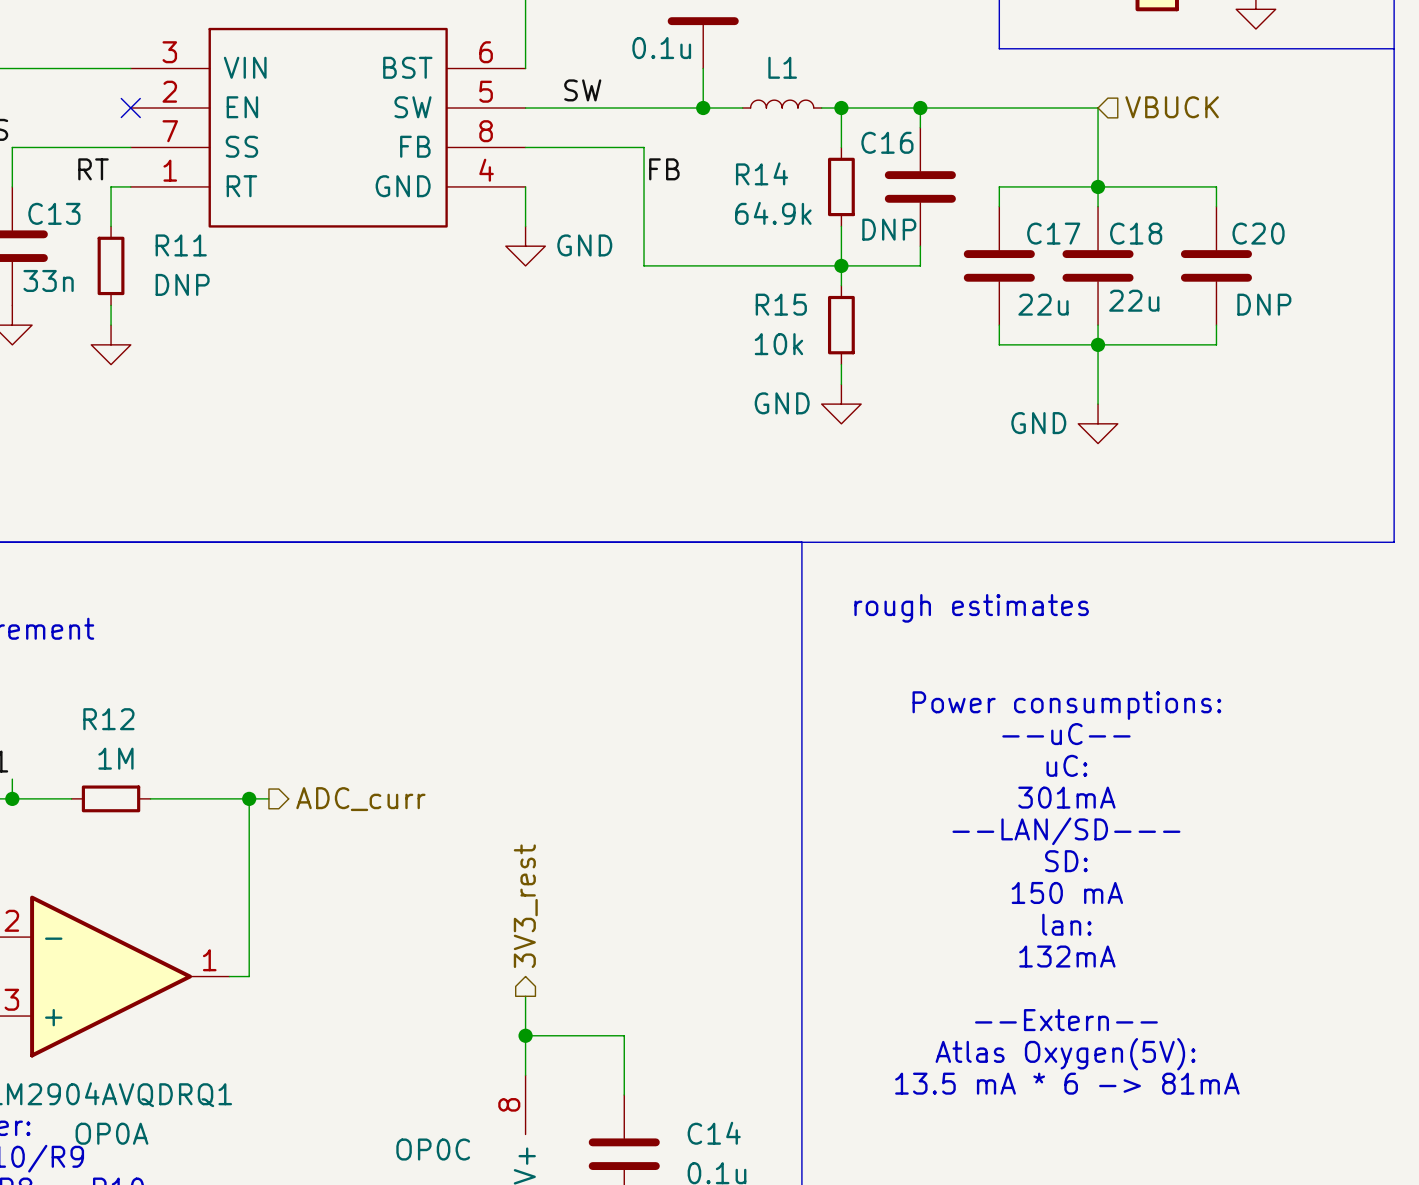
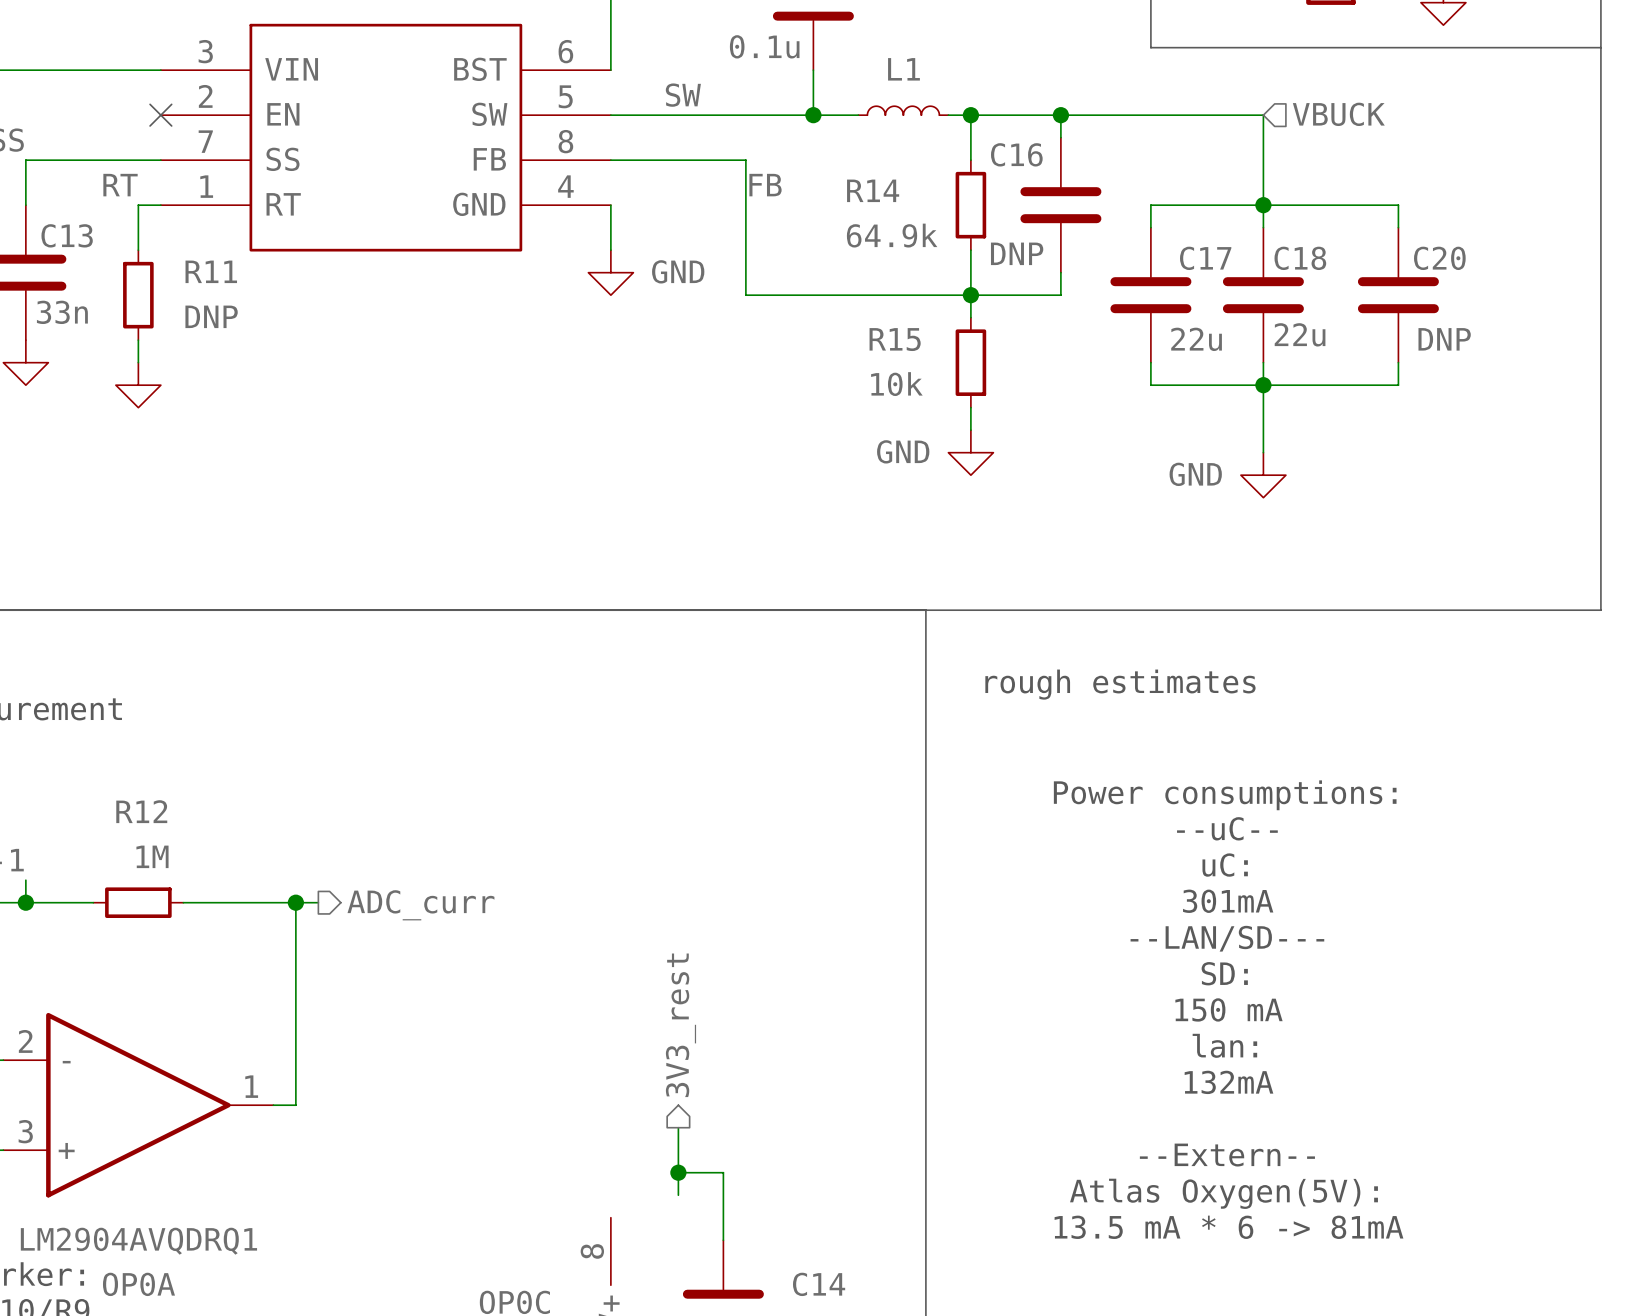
hierarchical label position: 3V3_rest (525, 906) -> 3V3_rest (680, 1025)
wire: (525, 996) (525, 1075) -> none
wire: none -> (678, 1127) (678, 1195)
wire: (525, 1035) (584, 1035) -> none
junction position: (525, 1035) -> (678, 1172)

